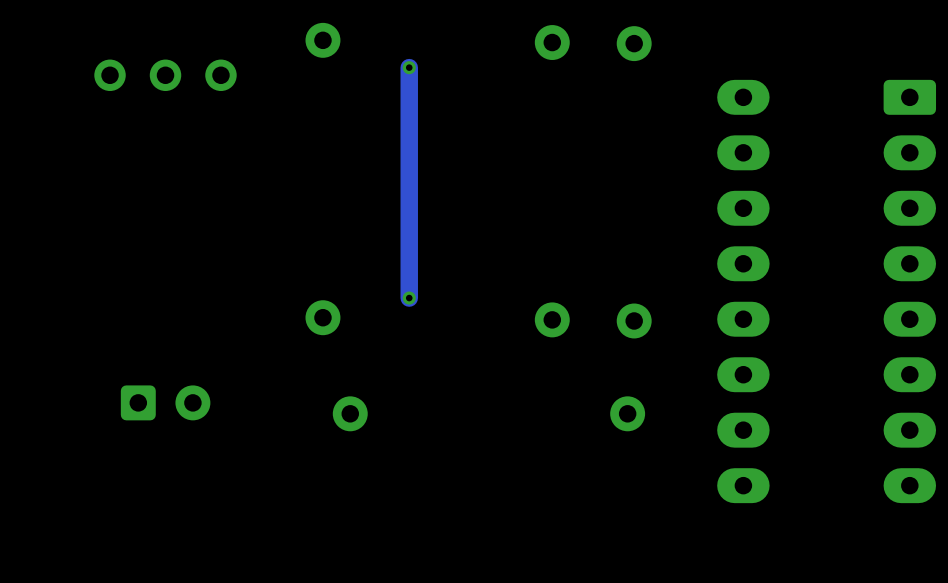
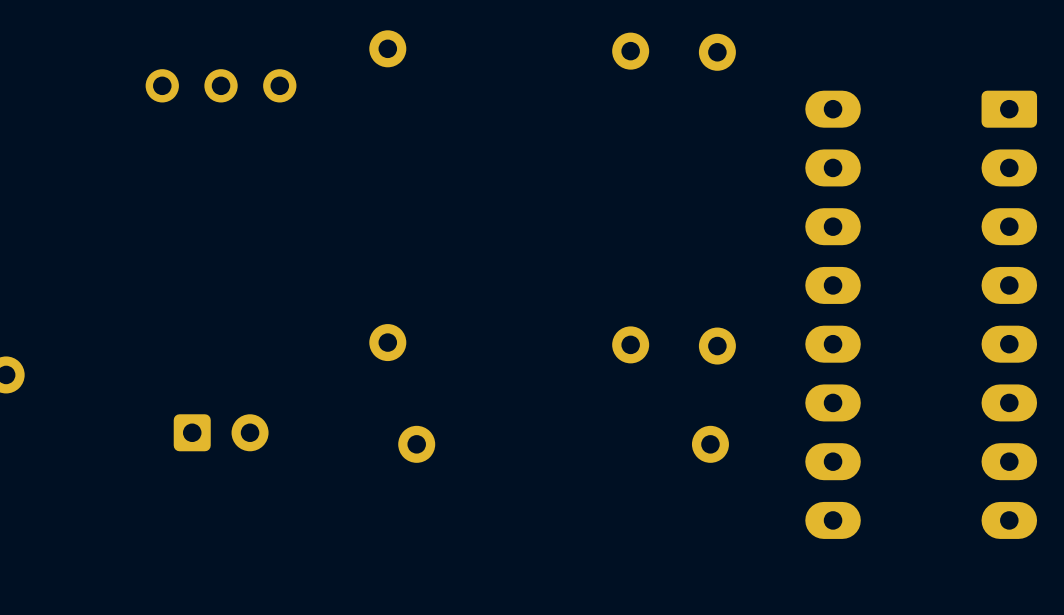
track: (409, 67) (409, 298) -> none
via: (409, 67) -> none
via: (409, 298) -> none

